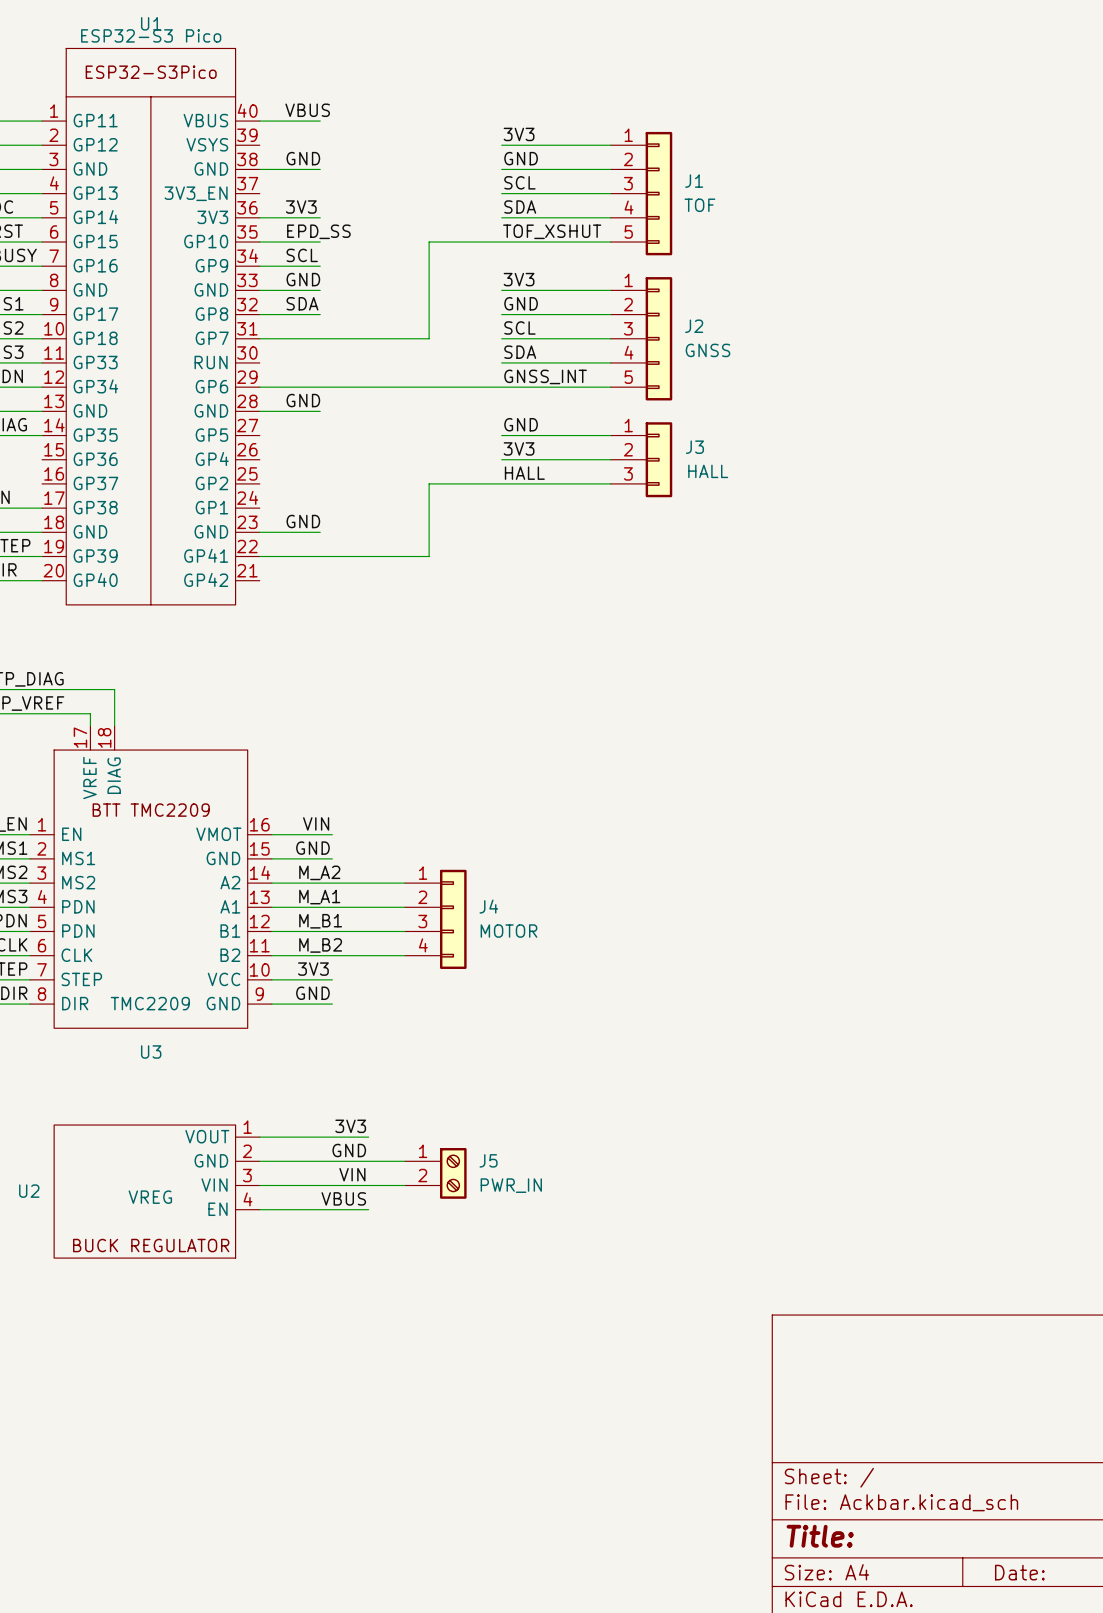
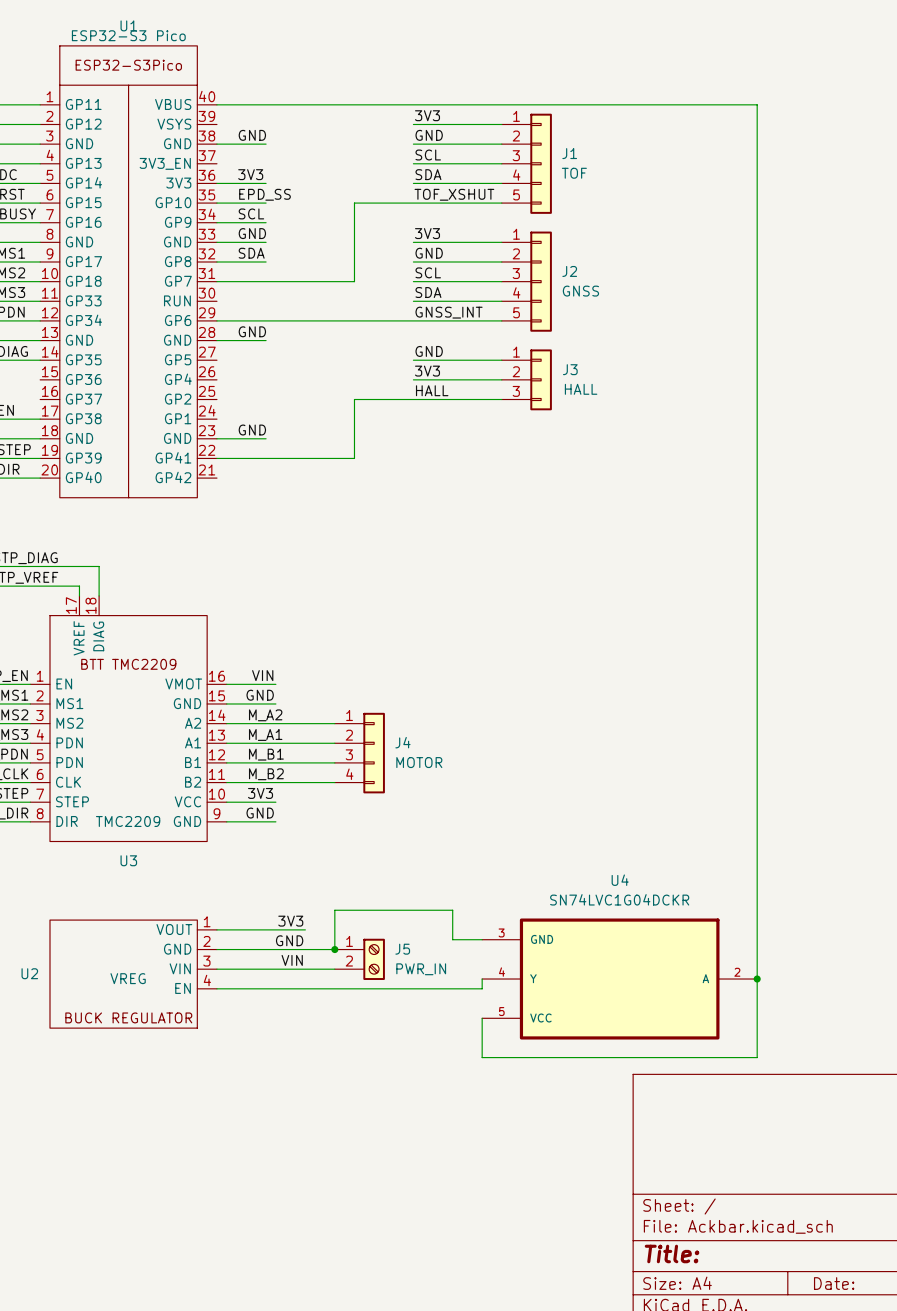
label: VBUS (307, 110) -> none
wire: none -> (266, 104) (757, 104) (757, 1057) (482, 1057) (482, 1018)
wire: none -> (482, 939) (452, 939) (452, 910) (334, 910) (334, 949)
junction: none -> (334, 949)
wire: none -> (482, 979) (482, 988) (305, 988)
U4: none -> SN74LVC1G04DCKR (619, 979)
junction: none -> (757, 979)
label: VBUS (343, 1198) -> none

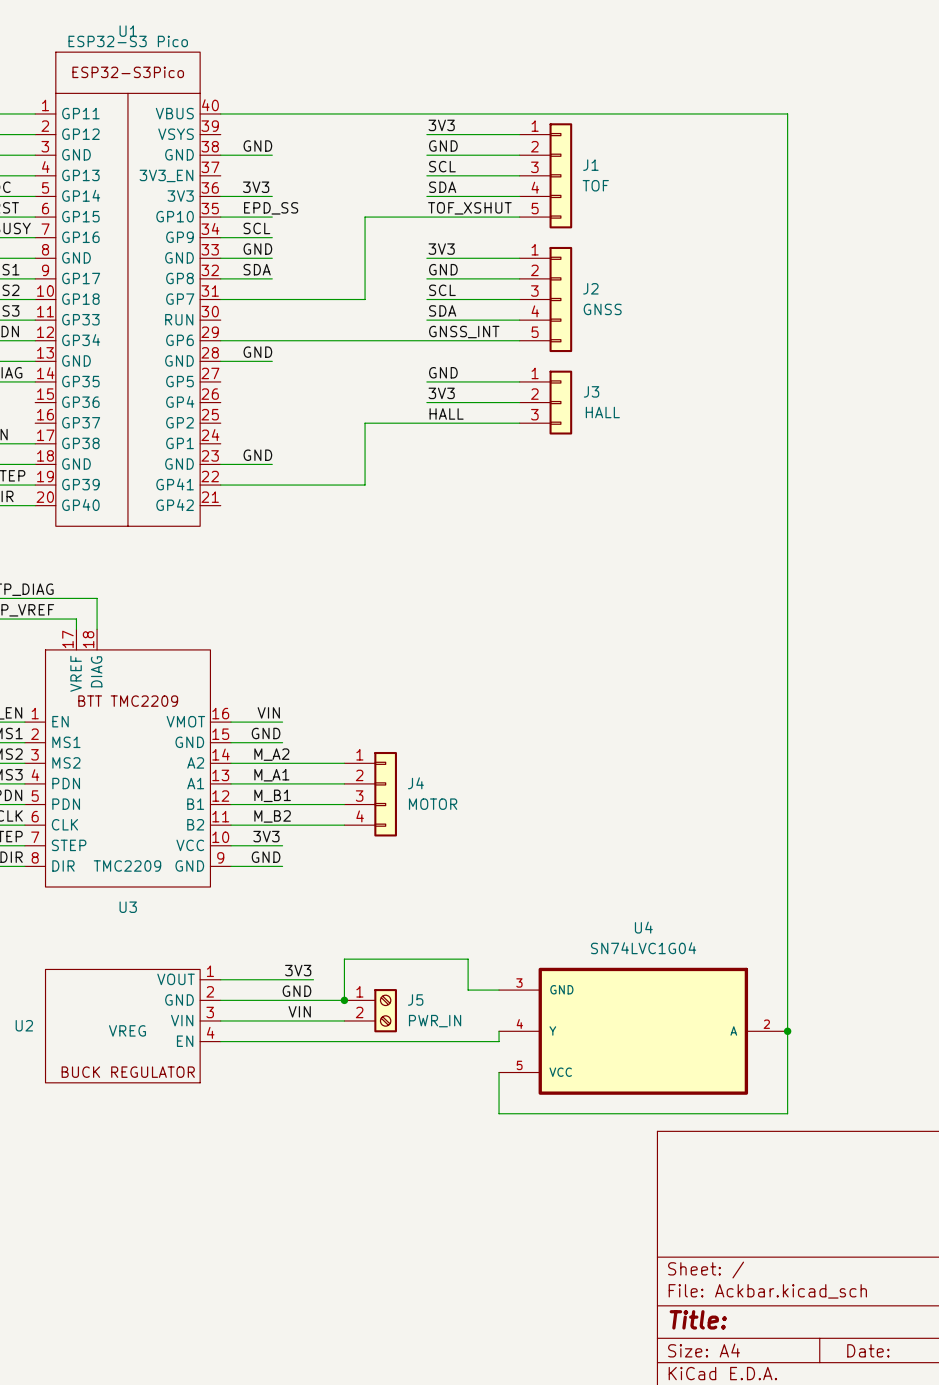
U4 value: SN74LVC1G04DCKR (619, 899) -> SN74LVC1G04 (643, 948)

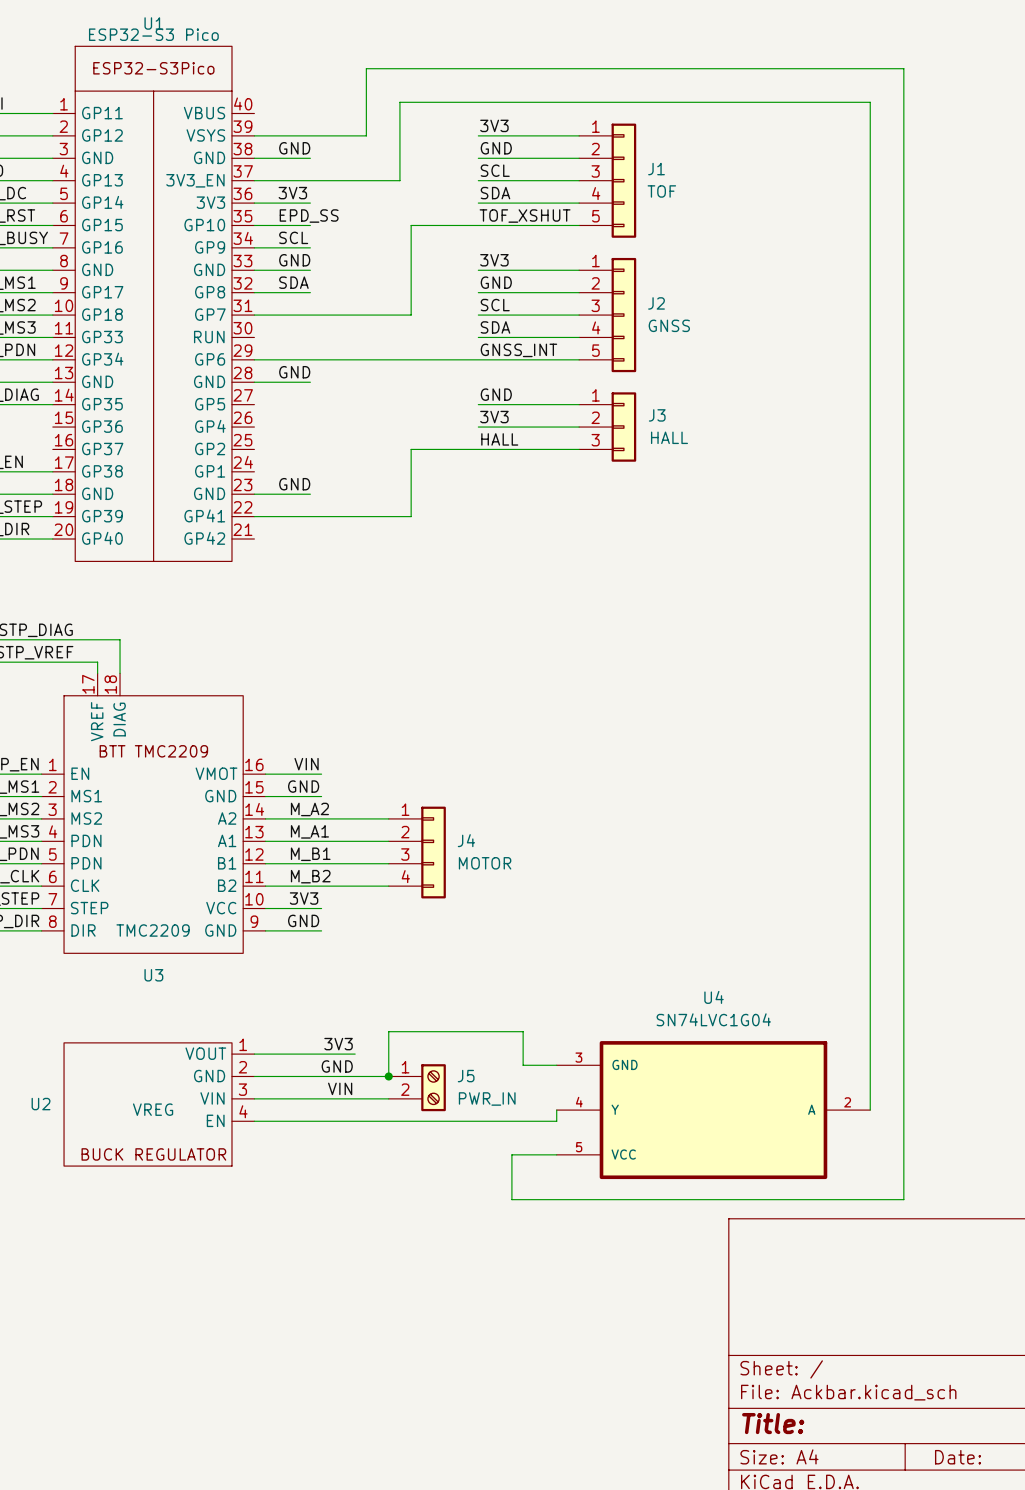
wire: (220, 113) (787, 113) -> (254, 180) (399, 180) (399, 102) (870, 102) (870, 113)
wire: (787, 1031) (787, 1113) -> (254, 135) (366, 135) (366, 68) (903, 68) (903, 1199) (870, 1199)
junction: (787, 1031) -> none
wire: (499, 1072) (499, 1113) -> (556, 1154) (511, 1154) (511, 1199) (556, 1199)

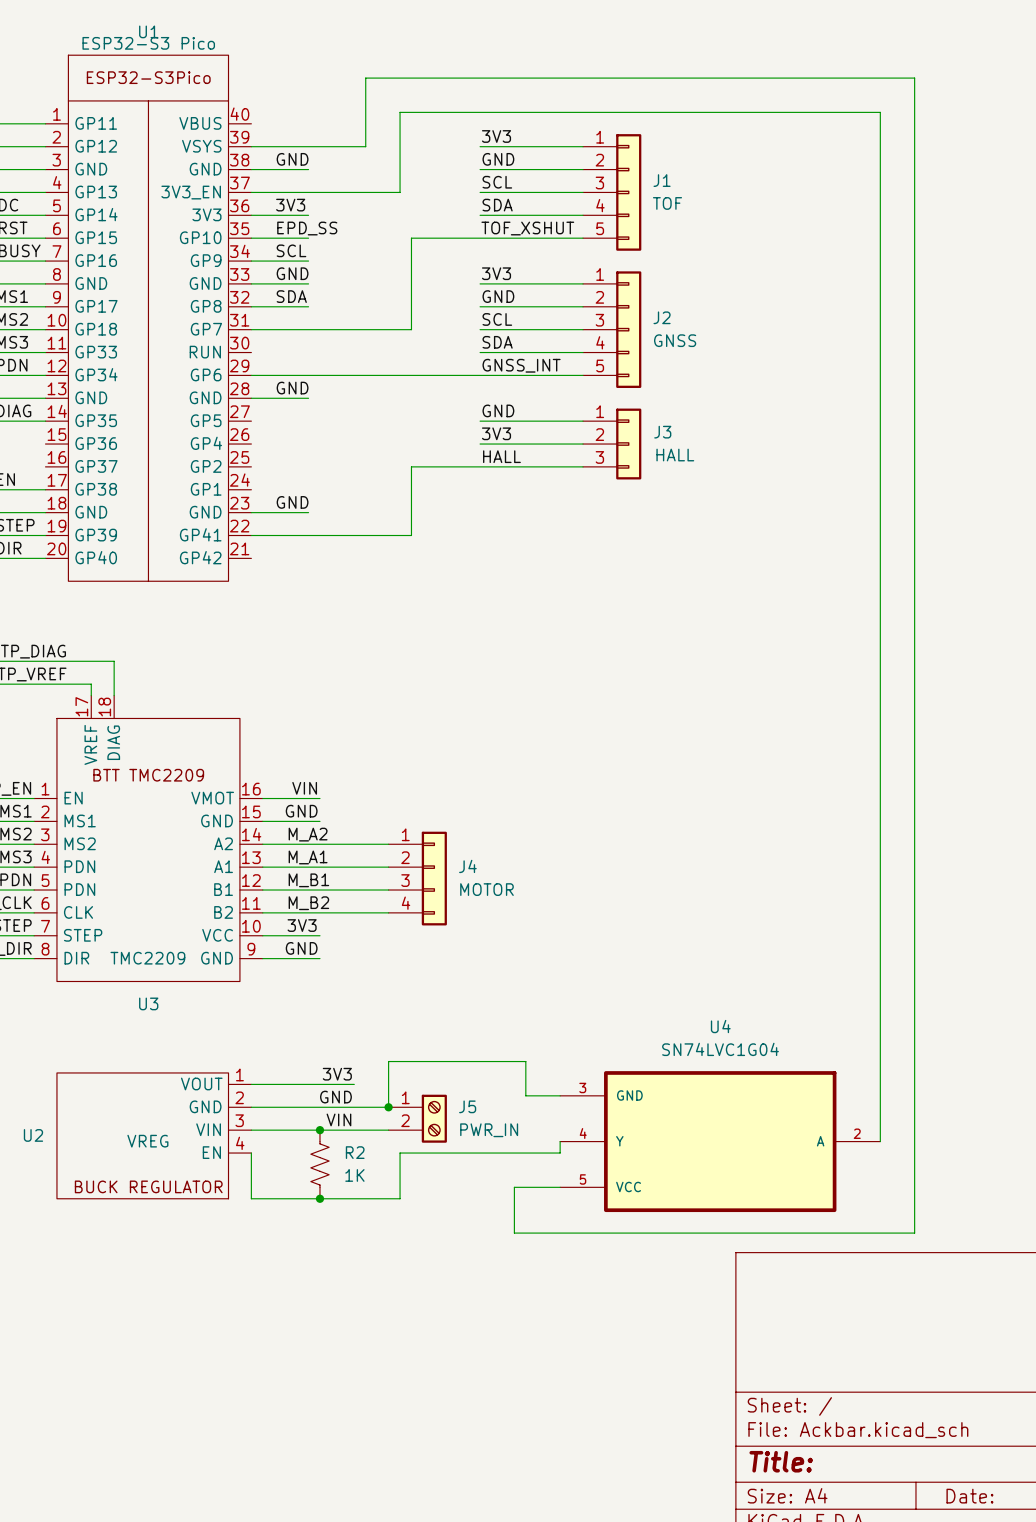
junction: none -> (319, 1130)
wire: (254, 1121) (399, 1121) -> (251, 1153) (251, 1198) (400, 1198) (400, 1153)
R2: none -> 1K (319, 1164)
junction: none -> (319, 1198)

